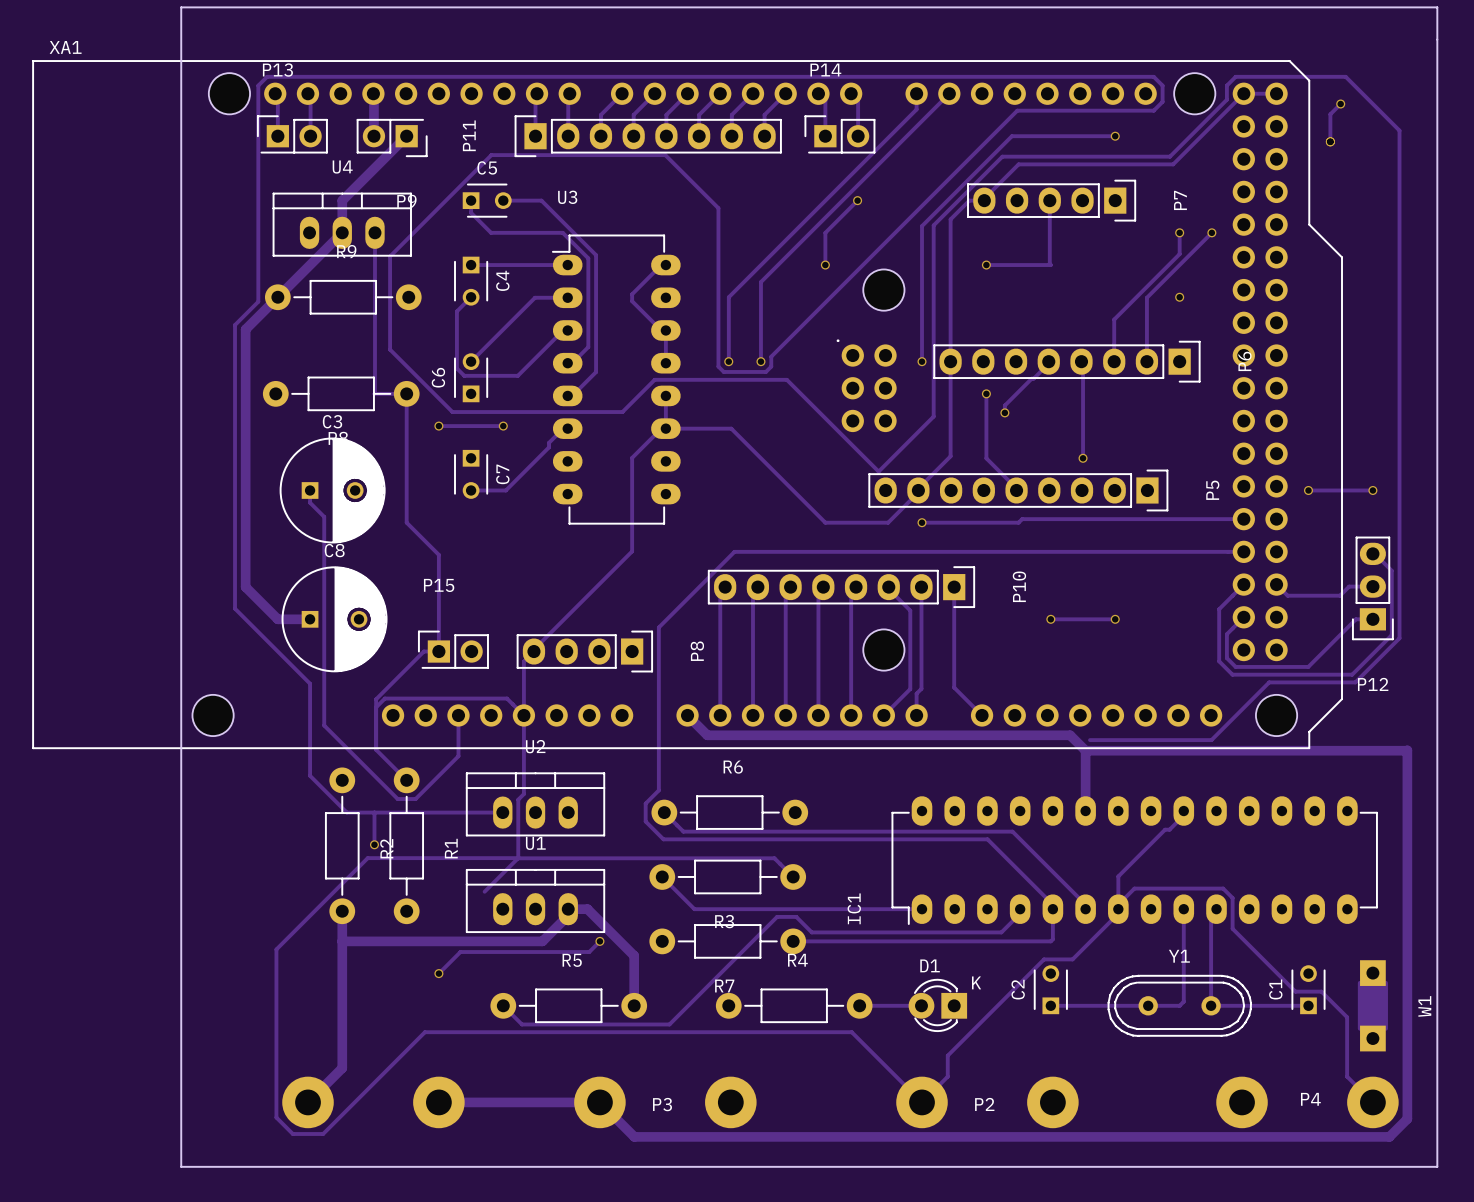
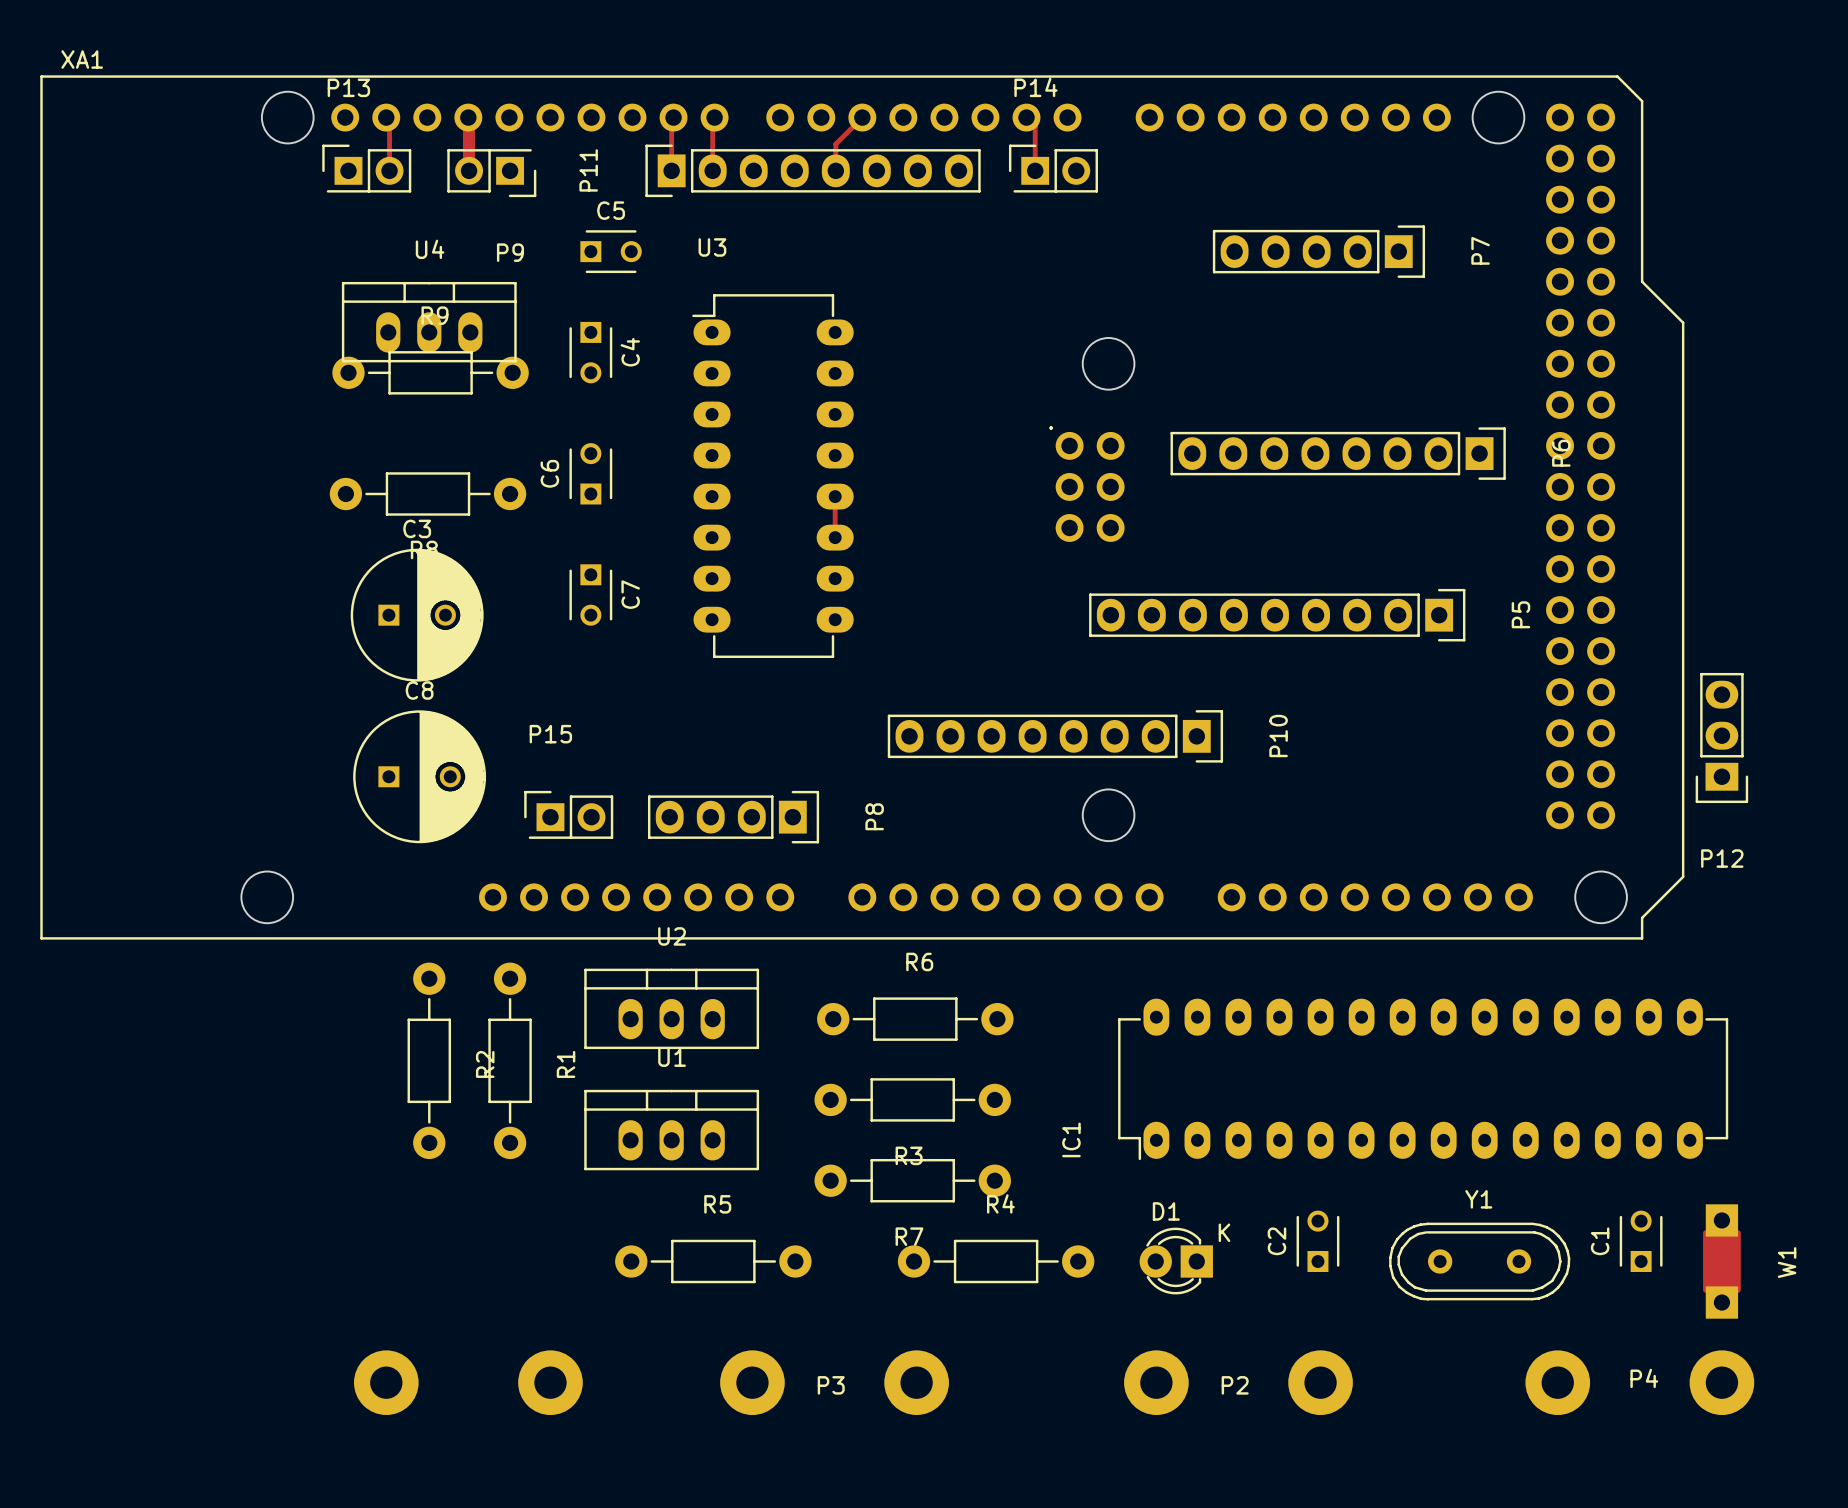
board edge: (181, 7) (1437, 7) (1437, 1166) (181, 1166) (181, 7) -> none
track: (275, 93) (277, 96) (277, 136) -> none
track: (622, 93) (600, 114) (600, 136) -> none
track: (654, 93) (633, 114) (633, 136) -> none
track: (720, 93) (699, 114) (699, 136) -> none
track: (752, 93) (731, 114) (731, 136) -> none
track: (785, 93) (764, 114) (764, 136) -> none
track: (851, 93) (858, 100) (858, 136) -> none
track: (916, 93) (916, 109) (728, 297) (728, 361) -> none
track: (949, 93) (760, 282) (760, 361) -> none
track: (1276, 93) (1243, 93) (1173, 164) (1018, 164) (984, 200) (969, 200) (950, 219) (950, 456) (888, 522) (825, 522) (731, 428) (661, 428) (632, 457) (632, 551) (523, 661) (523, 794) (518, 799) (518, 858) -> none
track: (1340, 104) (1330, 114) (1330, 141) -> none
via: (1340, 104) -> none
track: (406, 136) (342, 200) (342, 232) (245, 329) (245, 587) (277, 619) (310, 619) -> none
track: (1115, 136) (1011, 136) (922, 226) (922, 361) -> none
via: (1115, 136) -> none
via: (1330, 141) -> none
track: (471, 200) (471, 212) (491, 232) (562, 232) (588, 258) (588, 347) (572, 363) (567, 363) -> none
track: (503, 200) (541, 200) (596, 255) (596, 372) (572, 395) (567, 395) -> none
track: (857, 200) (825, 232) (825, 265) -> none
via: (857, 200) -> none
track: (1049, 200) (1050, 265) (986, 265) -> none
U4 position: (342, 224) -> (429, 322)
track: (374, 232) (374, 393) (406, 393) (406, 522) (438, 554) (438, 651) (423, 651) (376, 699) (376, 749) (406, 780) -> none
track: (1179, 232) (1179, 254) (1114, 319) (1114, 361) -> none
via: (1179, 232) -> none
track: (1211, 232) (1146, 297) (1146, 361) -> none
via: (1211, 232) -> none
track: (471, 265) (567, 265) -> none
track: (665, 265) (661, 265) (632, 294) (632, 301) (661, 330) (665, 330) (665, 363) -> none
via: (825, 265) -> none
via: (986, 265) -> none
track: (471, 297) (456, 311) (456, 368) (464, 375) (517, 375) (563, 330) (567, 330) -> none
track: (567, 297) (535, 297) (471, 361) -> none
via: (1179, 297) -> none
via: (728, 361) -> none
via: (760, 361) -> none
via: (922, 361) -> none
track: (1048, 361) (1004, 405) (1004, 412) -> none
track: (1081, 361) (1083, 363) (1083, 458) -> none
track: (986, 393) (986, 458) (1016, 490) -> none
via: (986, 393) -> none
via: (1004, 412) -> none
track: (438, 426) (503, 426) -> none
via: (438, 426) -> none
via: (503, 426) -> none
track: (567, 428) (563, 428) (549, 442) (549, 447) (505, 490) (471, 490) -> none
via: (1083, 458) -> none
track: (310, 490) (310, 502) (324, 516) (324, 725) (397, 799) (415, 799) (458, 756) (458, 715) -> none
track: (1308, 490) (1372, 490) -> none
via: (1308, 490) -> none
via: (1372, 490) -> none
track: (1243, 519) (1022, 519) (1018, 522) (922, 522) -> none
via: (922, 522) -> none
track: (1243, 551) (734, 551) (658, 627) (658, 790) (645, 803) (645, 821) (663, 839) (987, 839) (1052, 904) (1052, 939) (1050, 941) (793, 941) -> none
track: (1370, 553) (1374, 553) (1391, 570) (1391, 635) (1352, 674) (1232, 674) (1219, 661) (1219, 609) (1243, 584) -> none
track: (1276, 584) (1287, 595) (1340, 595) (1349, 586) (1372, 586) -> none
track: (725, 587) (720, 591) (720, 715) -> none
track: (757, 587) (752, 591) (752, 715) -> none
track: (790, 587) (785, 591) (785, 715) -> none
track: (823, 587) (818, 591) (818, 715) -> none
track: (856, 587) (851, 591) (851, 715) -> none
track: (888, 587) (910, 610) (910, 689) (883, 715) -> none
track: (921, 587) (921, 688) (916, 693) (916, 715) -> none
track: (954, 587) (954, 687) (982, 715) -> none
track: (1243, 617) (1226, 634) (1226, 658) (1235, 666) (1308, 666) (1355, 619) (1372, 619) -> none
track: (1050, 619) (1115, 619) -> none
via: (1050, 619) -> none
via: (1115, 619) -> none
track: (376, 707) (384, 698) (507, 698) (523, 715) -> none
track: (687, 715) (707, 735) (1070, 735) (1085, 750) -> none
track: (1090, 740) (1211, 740) (1269, 682) (1355, 682) (1399, 638) (1399, 130) (1345, 76) (1235, 76) (1226, 85) (1226, 99) (1169, 156) (1002, 156) (933, 225) (933, 416) (878, 471) (786, 379) (654, 379) (622, 412) (452, 412) (390, 349) (390, 256) (491, 155) (665, 155) (718, 208) (718, 366) (723, 371) (765, 371) (771, 366) (771, 356) (1017, 110) (1153, 110) (1162, 101) (1162, 85) (1153, 76) (267, 76) (258, 85) (258, 301) (235, 325) (235, 608) (310, 683) (310, 775) (346, 812) (502, 812) -> none
track: (1085, 750) (1407, 750) (1407, 1118) (1389, 1136) (634, 1136) (599, 1102) (438, 1102) -> none
track: (1085, 750) (1085, 811) -> none
track: (1183, 811) (1183, 815) (1169, 829) (1165, 829) (1118, 876) (1118, 913) (1072, 959) (1044, 959) (947, 1055) (947, 1076) (922, 1102) (851, 1032) (424, 1032) (323, 1133) (292, 1133) (276, 1117) (276, 949) (367, 858) (518, 858) -> none
track: (374, 812) (374, 844) -> none
track: (664, 812) (683, 831) (1012, 831) (1085, 904) (1085, 909) -> none
via: (374, 844) -> none
track: (518, 858) (484, 891) -> none
track: (518, 858) (774, 858) (793, 876) -> none
track: (662, 876) (694, 909) (922, 909) -> none
track: (1118, 904) (1134, 888) (1223, 888) (1232, 898) (1232, 928) (1295, 991) (1321, 991) (1347, 1017) (1347, 1076) (1372, 1102) -> none
track: (1020, 909) (1020, 913) (1001, 932) (811, 932) (796, 916) (777, 916) (669, 1024) (521, 1024) (502, 1005) -> none
track: (1183, 909) (1183, 1001) (1179, 1005) (1148, 1005) -> none
track: (1216, 909) (1211, 914) (1211, 1005) (1308, 1005) -> none
track: (342, 911) (342, 1068) (308, 1102) -> none
track: (342, 941) (542, 941) (568, 915) (568, 909) (587, 909) (634, 955) (634, 1005) -> none
track: (599, 941) (589, 952) (460, 952) (438, 973) -> none
via: (599, 941) -> none
via: (438, 973) -> none
track: (859, 1005) (921, 1005) -> none
track: (1050, 1005) (1147, 1005) -> none

